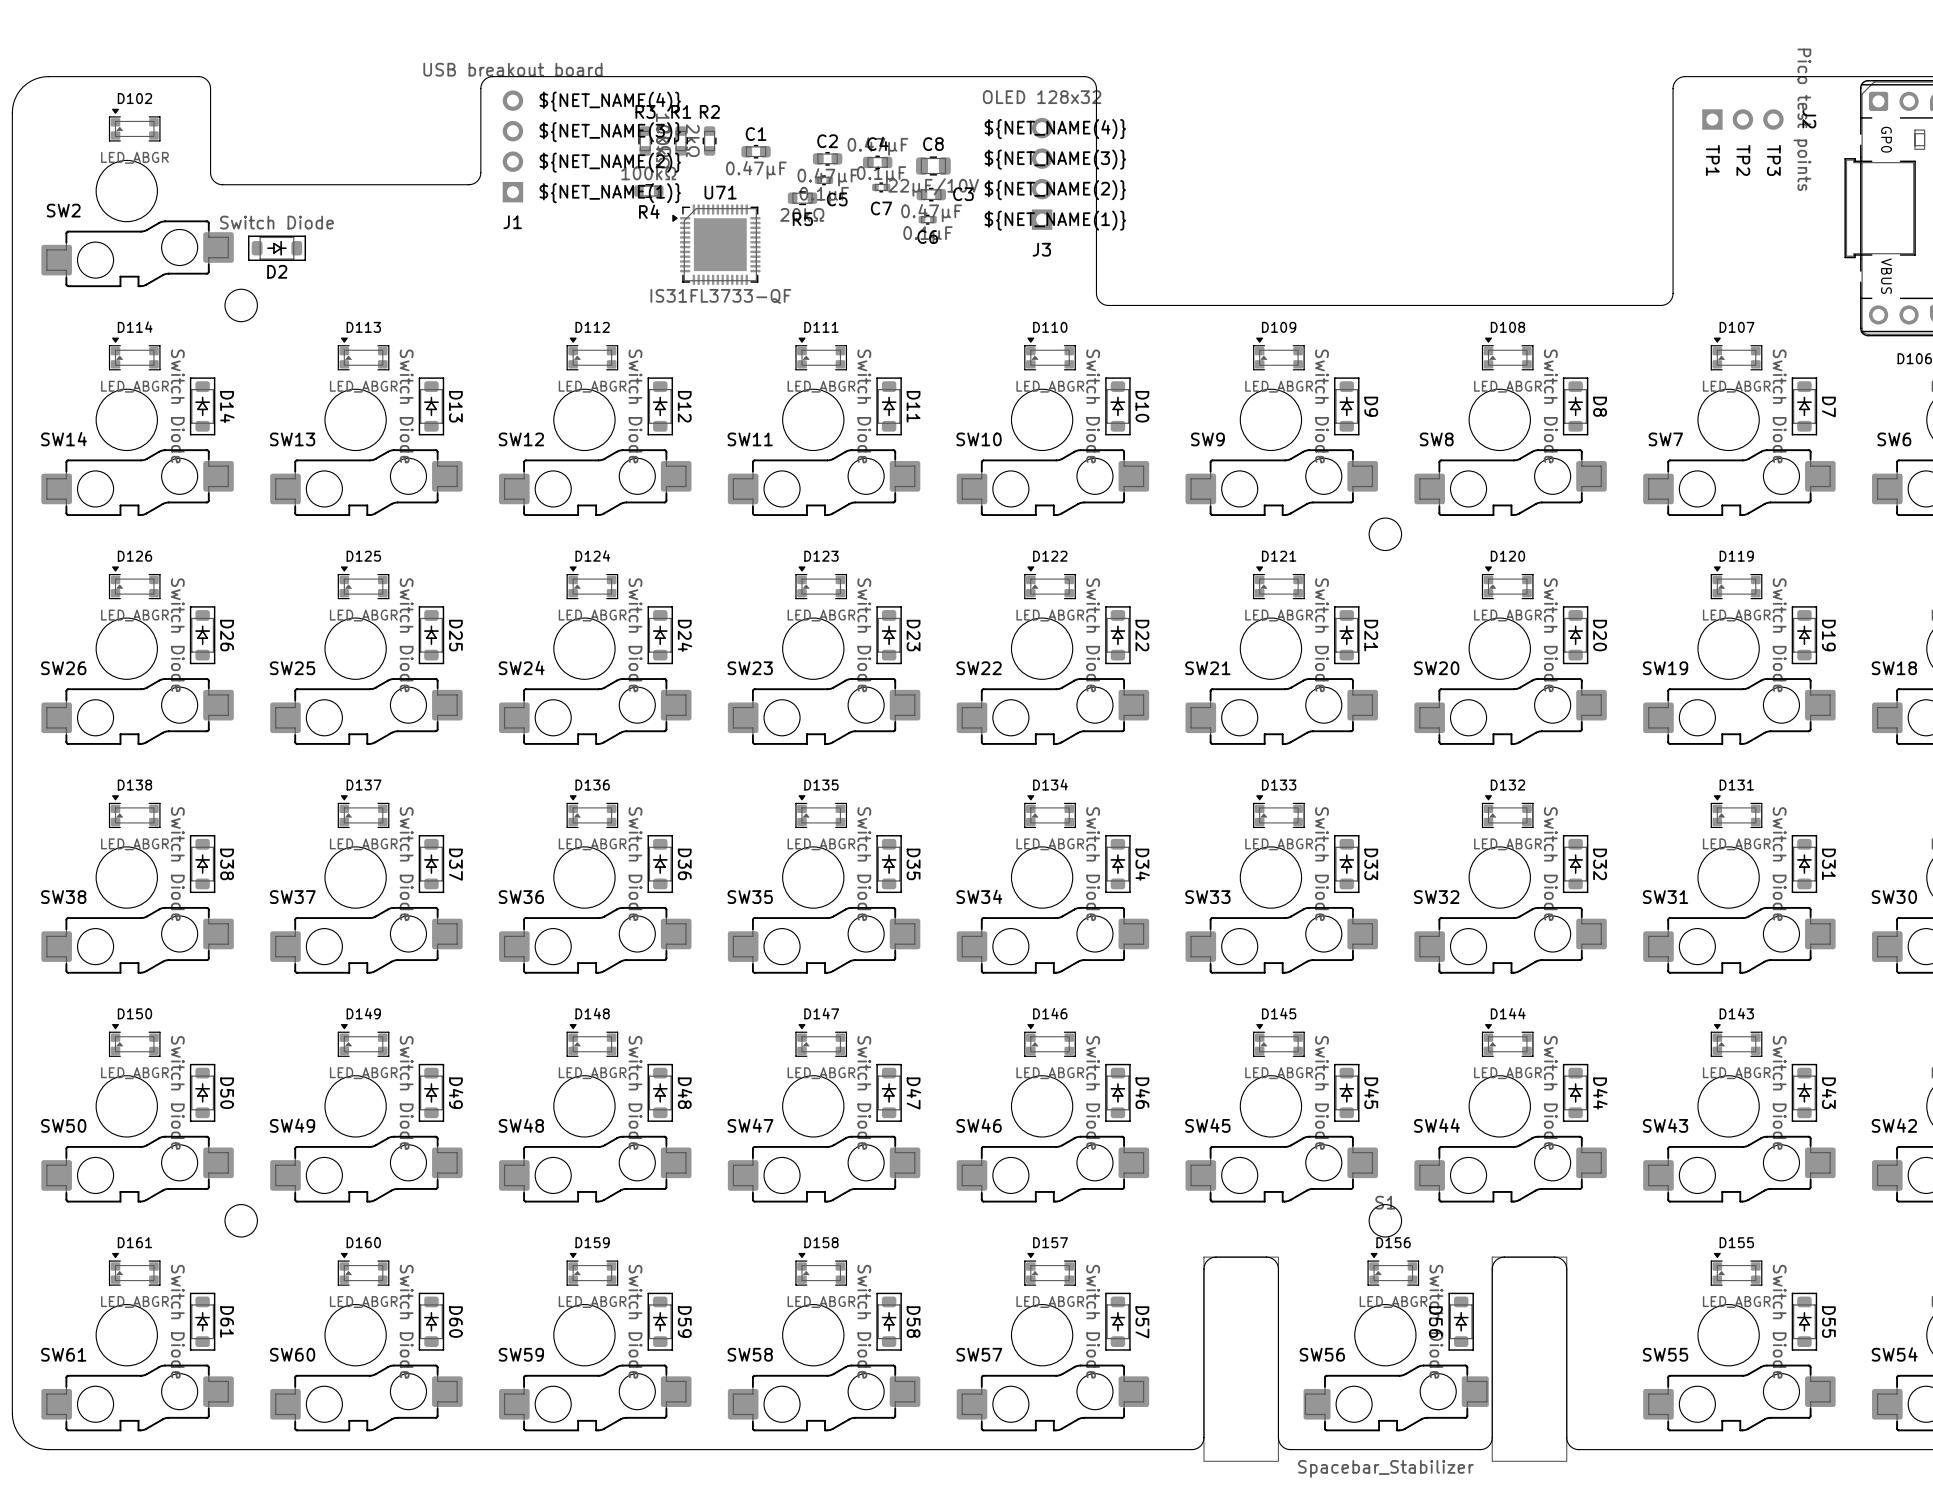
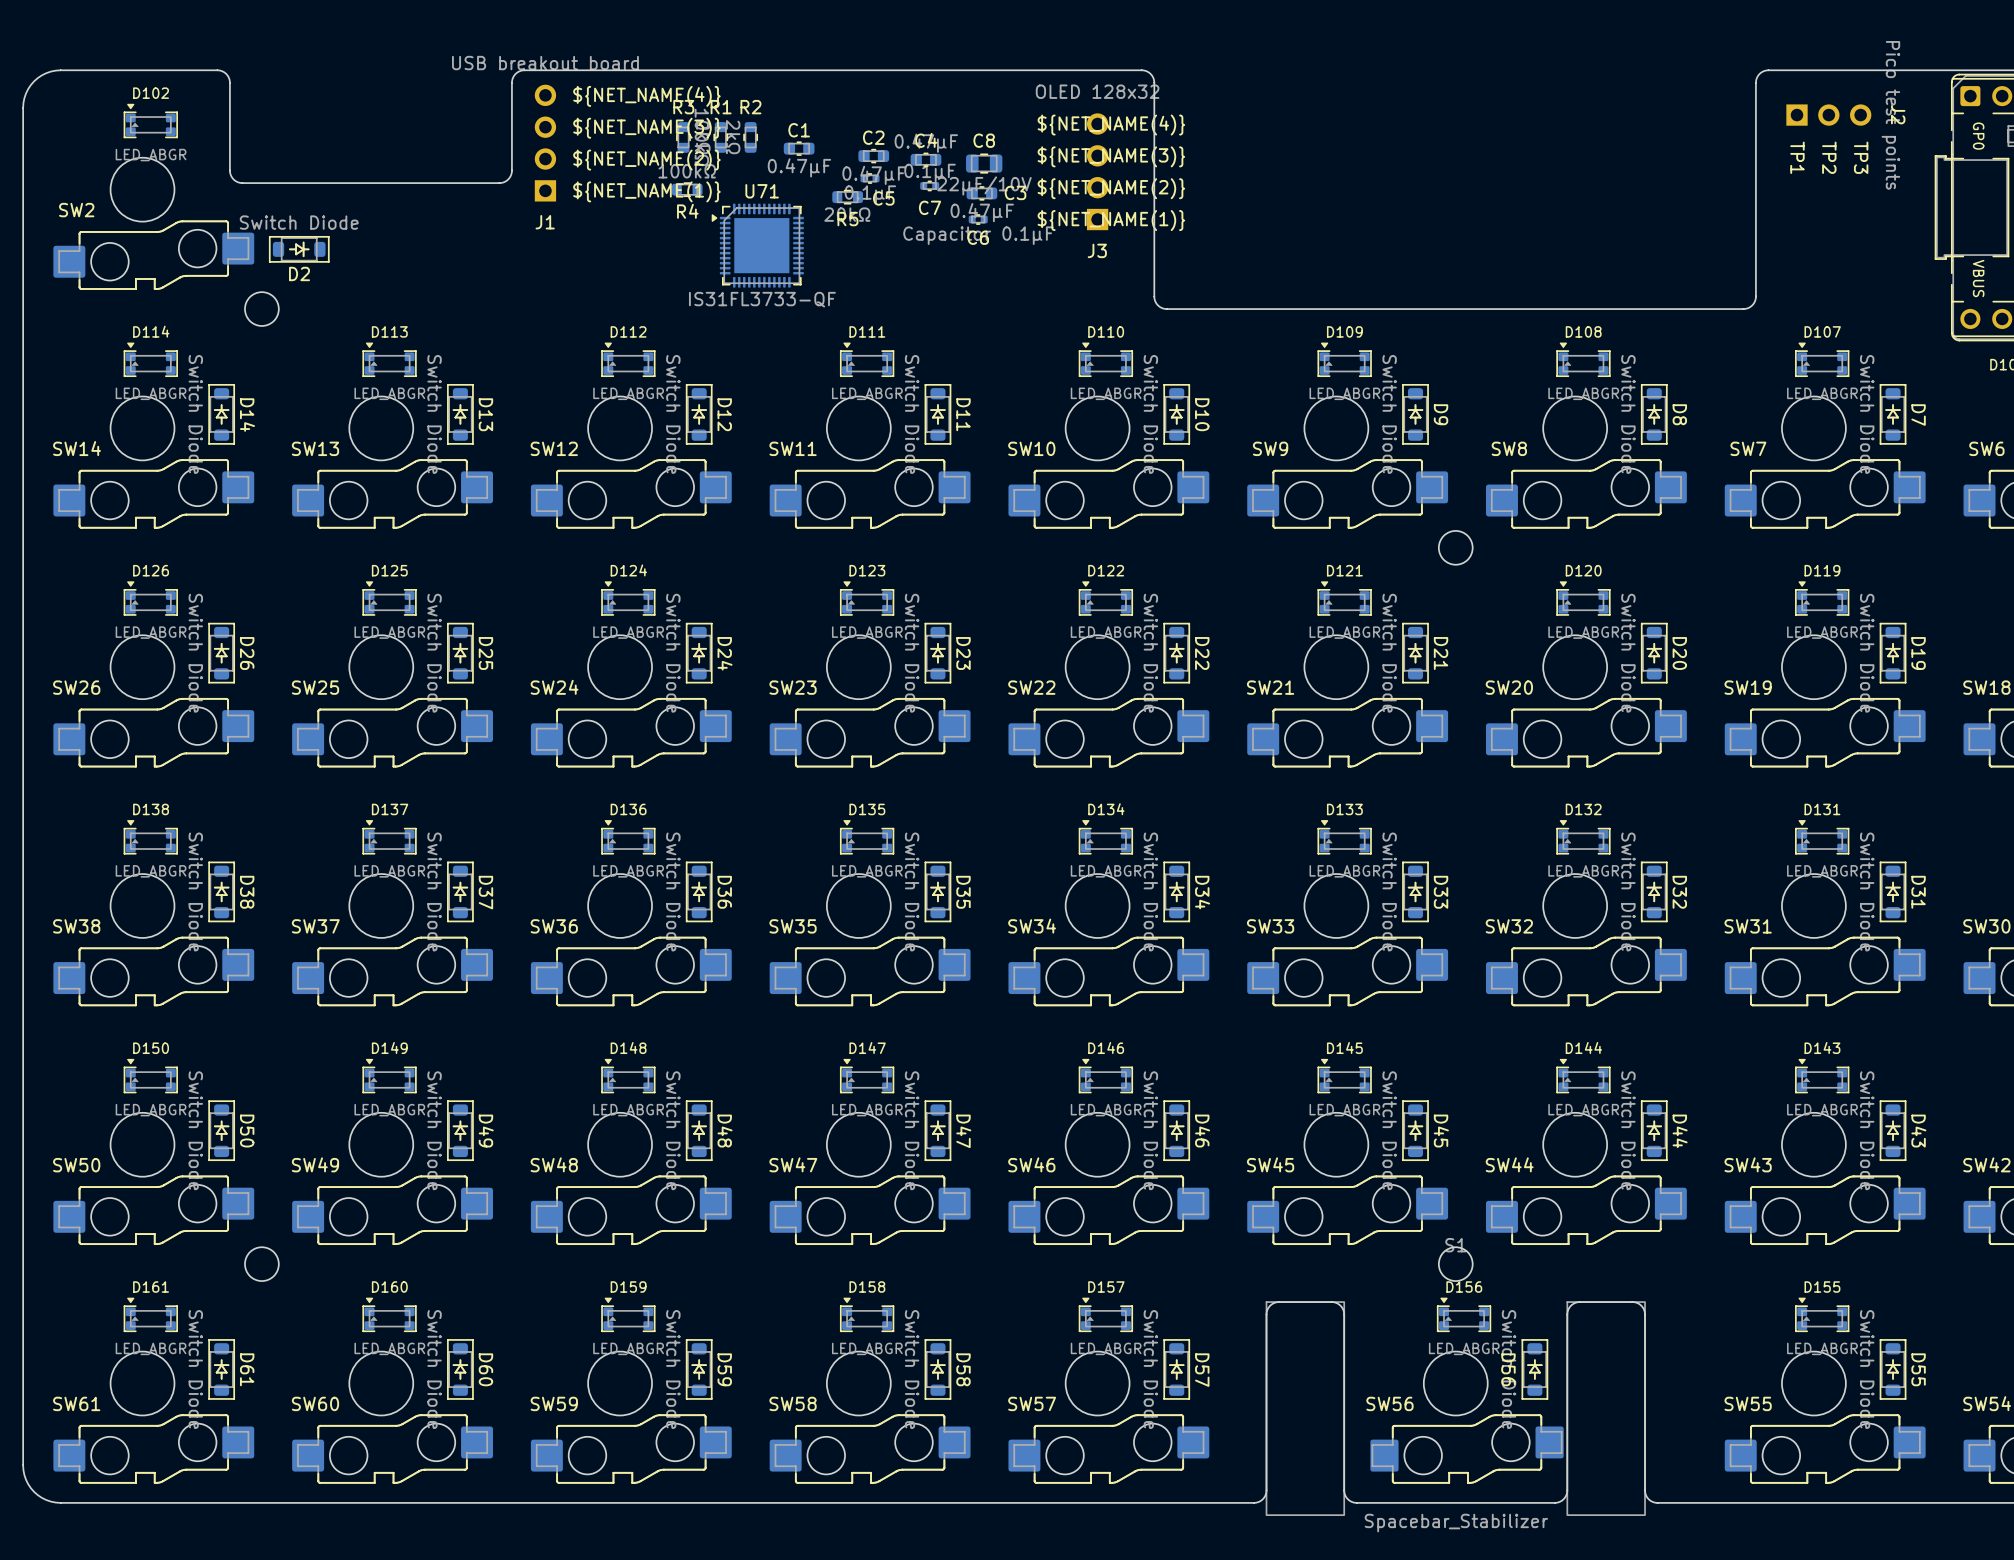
C6 value: 0.1µF (927, 235) -> Capacitor 0.1µF (978, 235)

